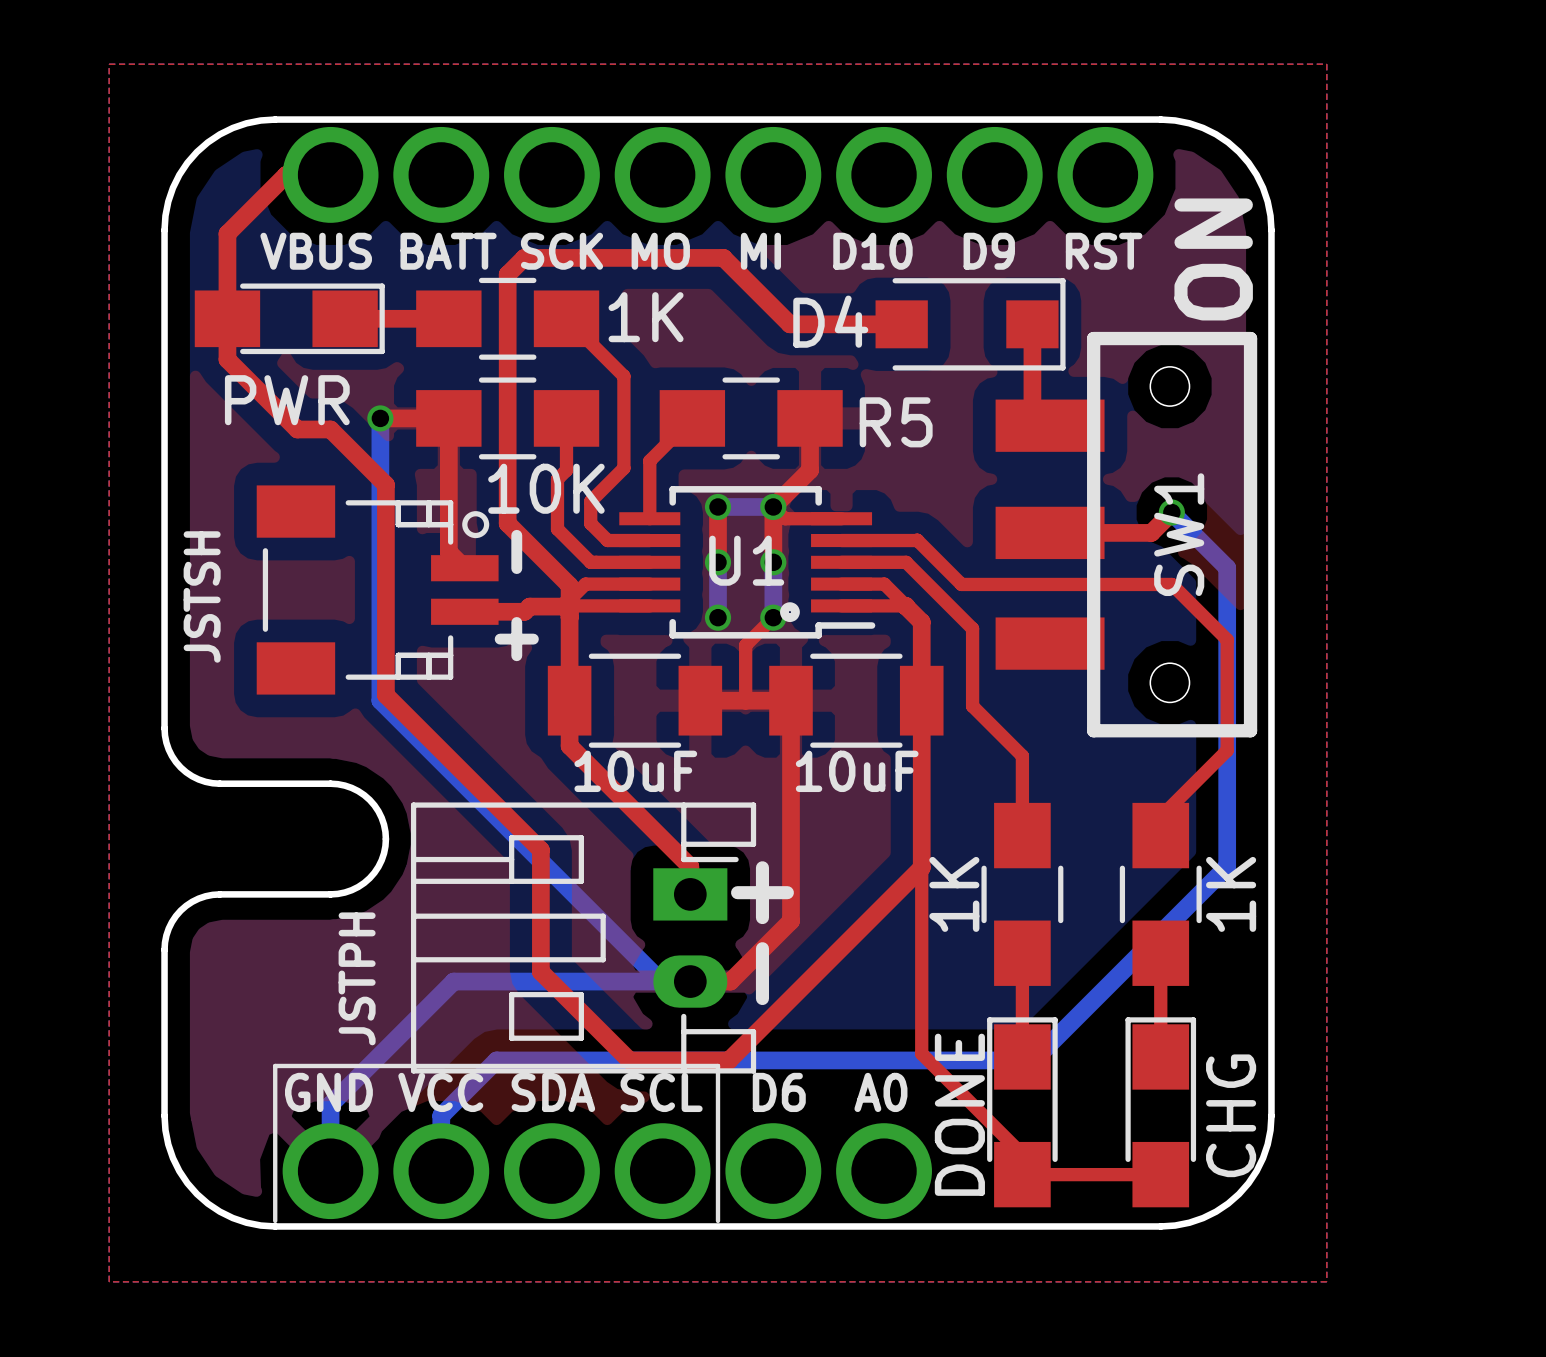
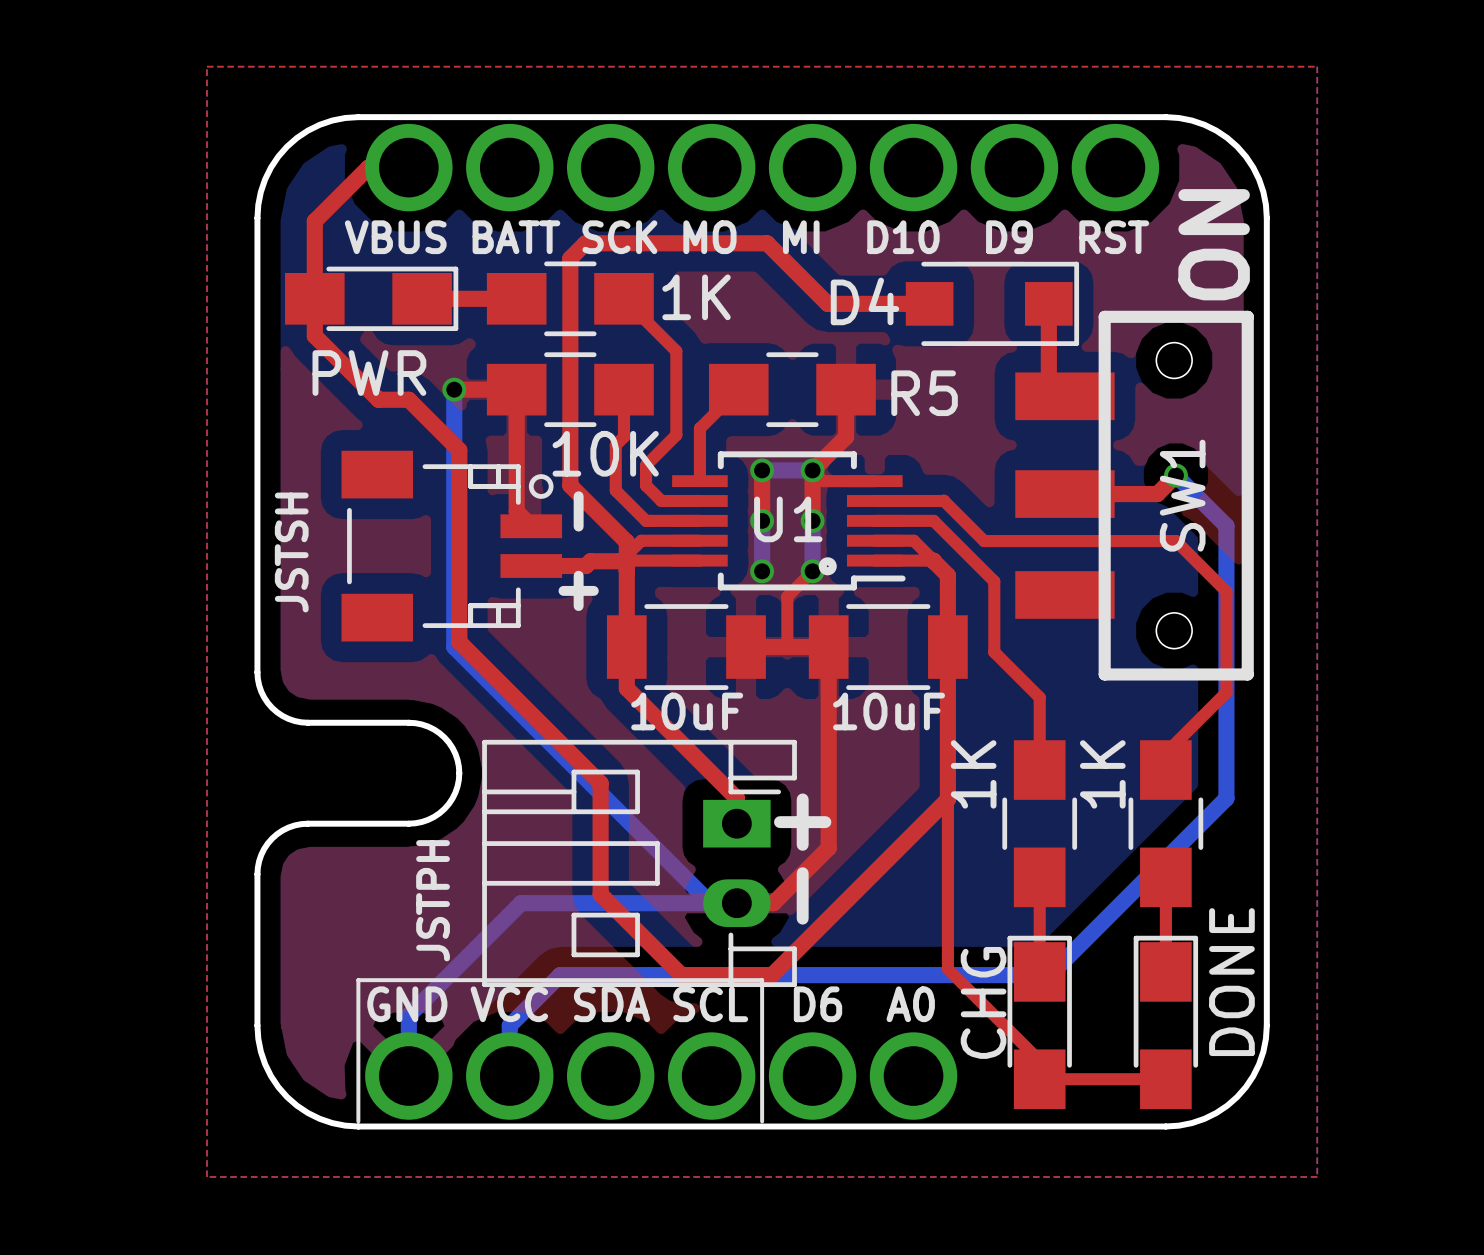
part value position: 1K (954, 894) -> 1K (973, 774)
part value position: 1K (1231, 894) -> 1K (1102, 774)
part value: DONE (959, 1114) -> CHG (983, 1002)
part value: CHG (1231, 1115) -> DONE (1231, 982)

